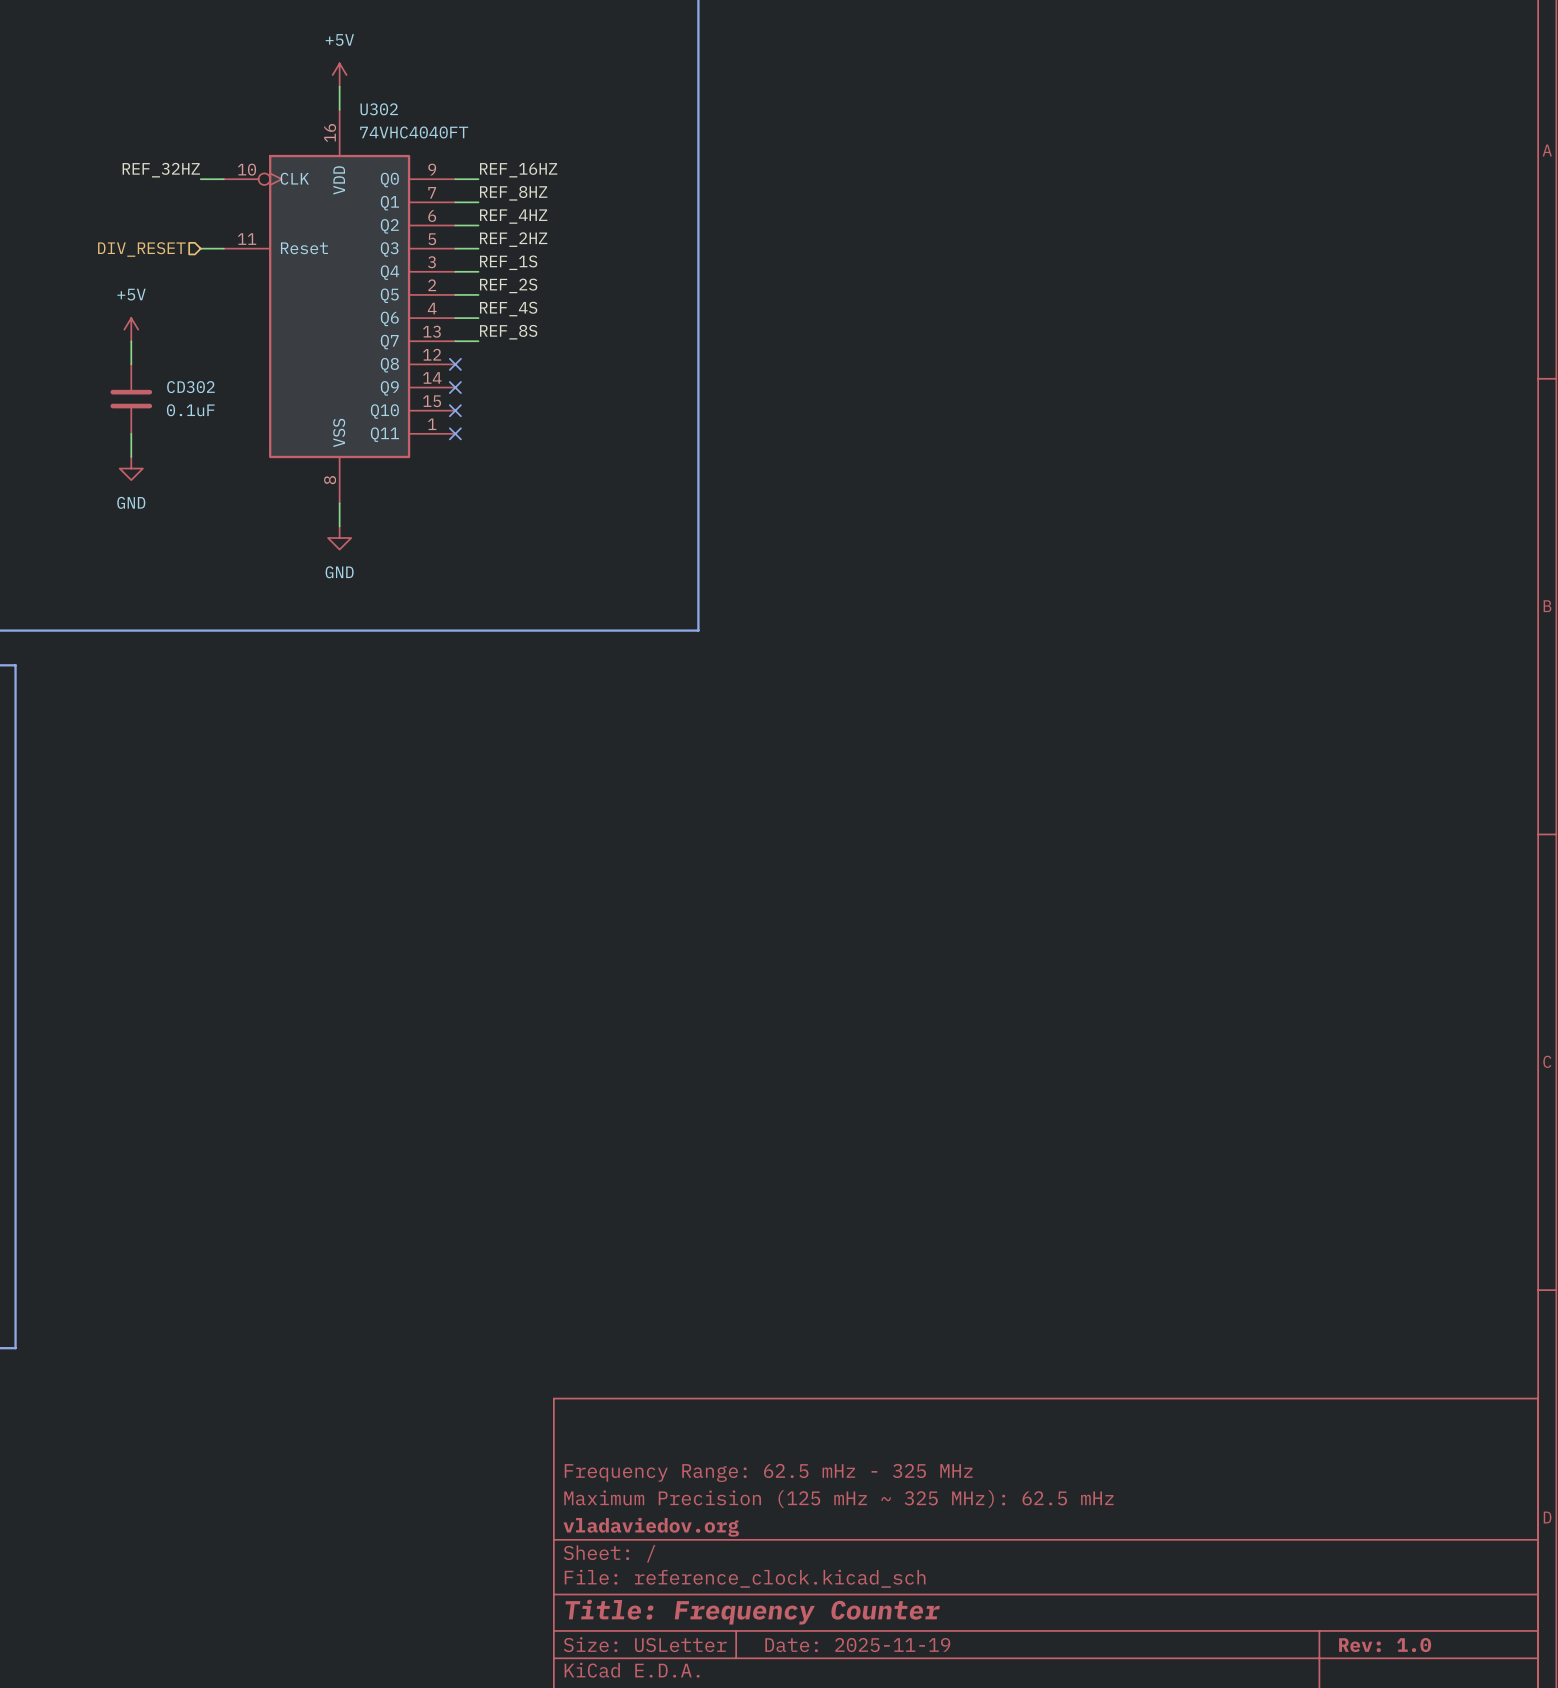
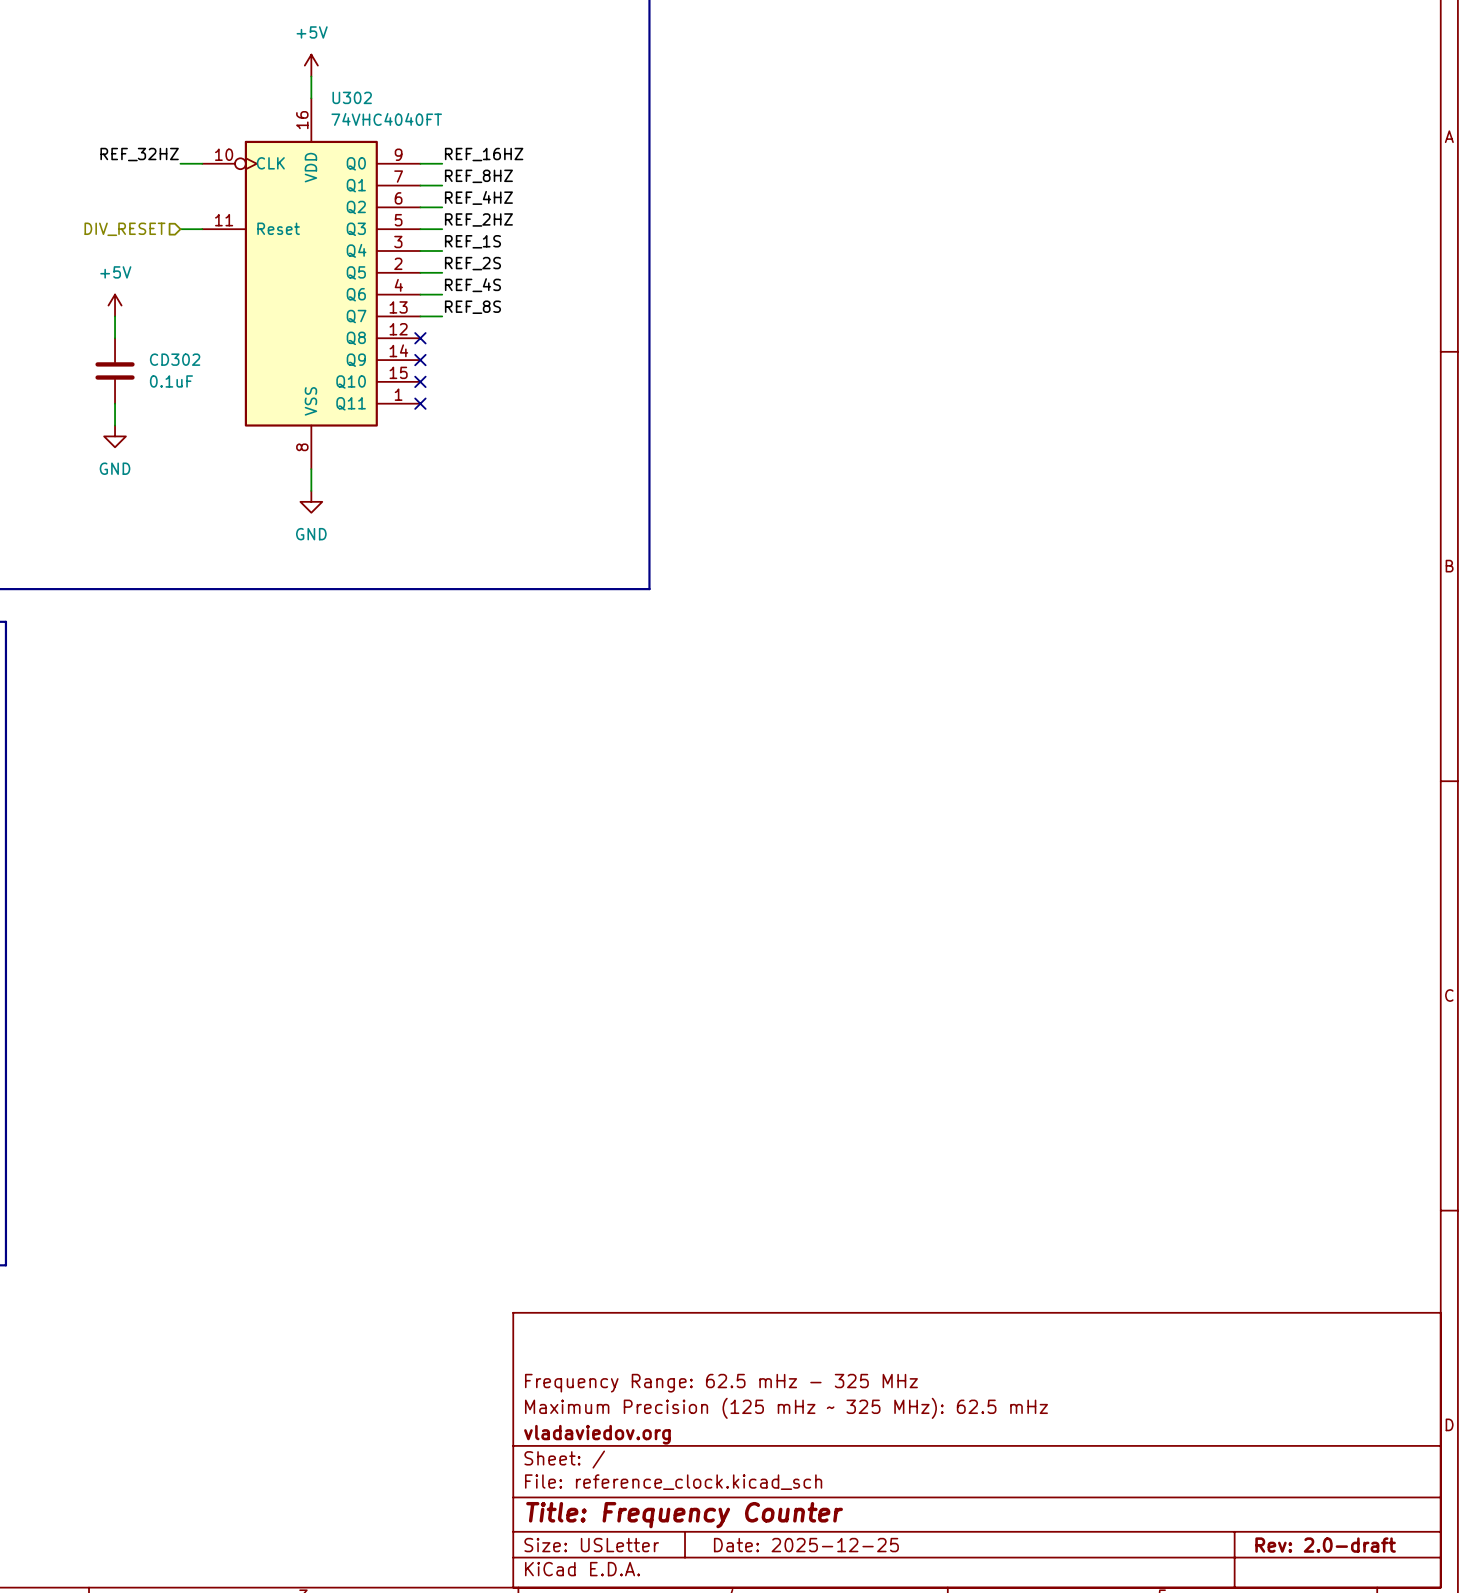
title block: Date: 2025-11-19 (857, 1645) -> Date: 2025-12-25 (806, 1545)
title block: Rev: 1.0 (1385, 1645) -> Rev: 2.0-draft (1325, 1545)

